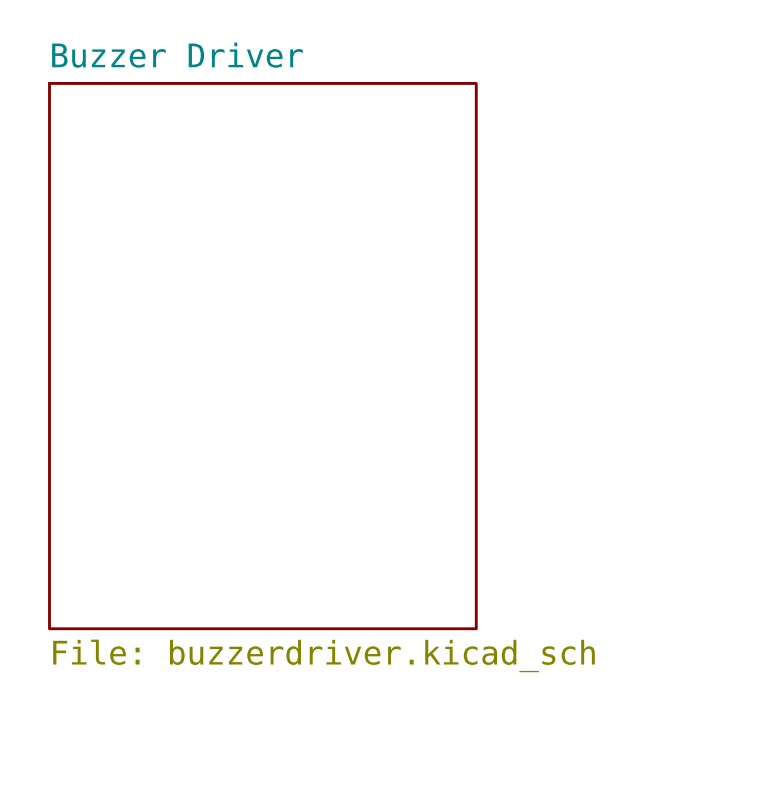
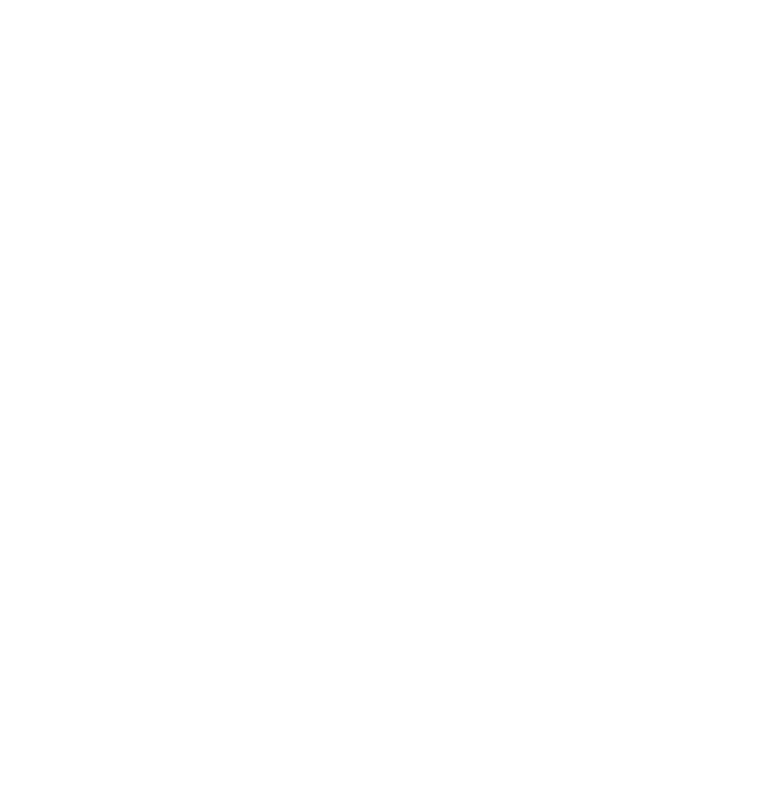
sheet Buzzer Driver: File: buzzerdriver.kicad_sch (262, 356) -> none

